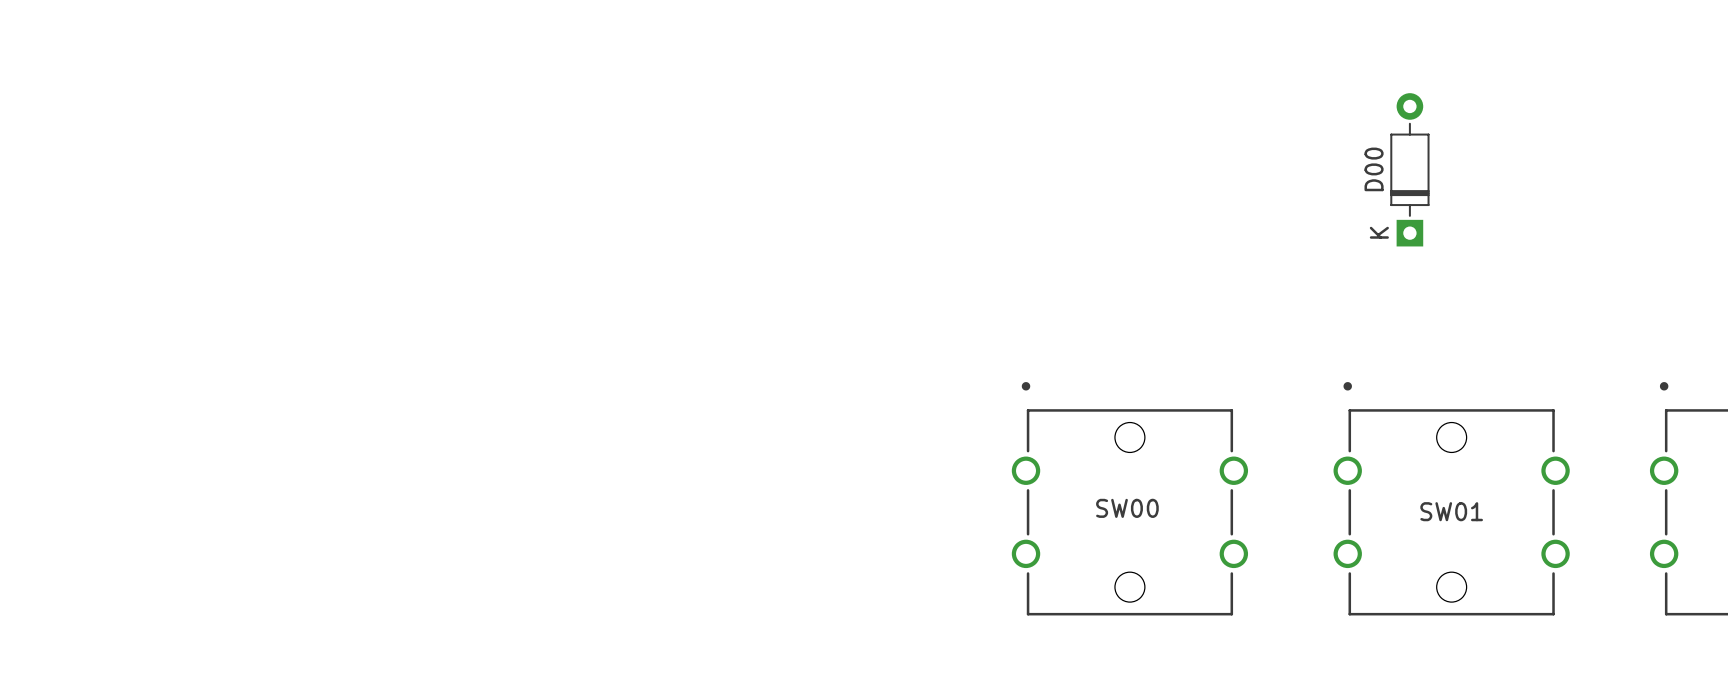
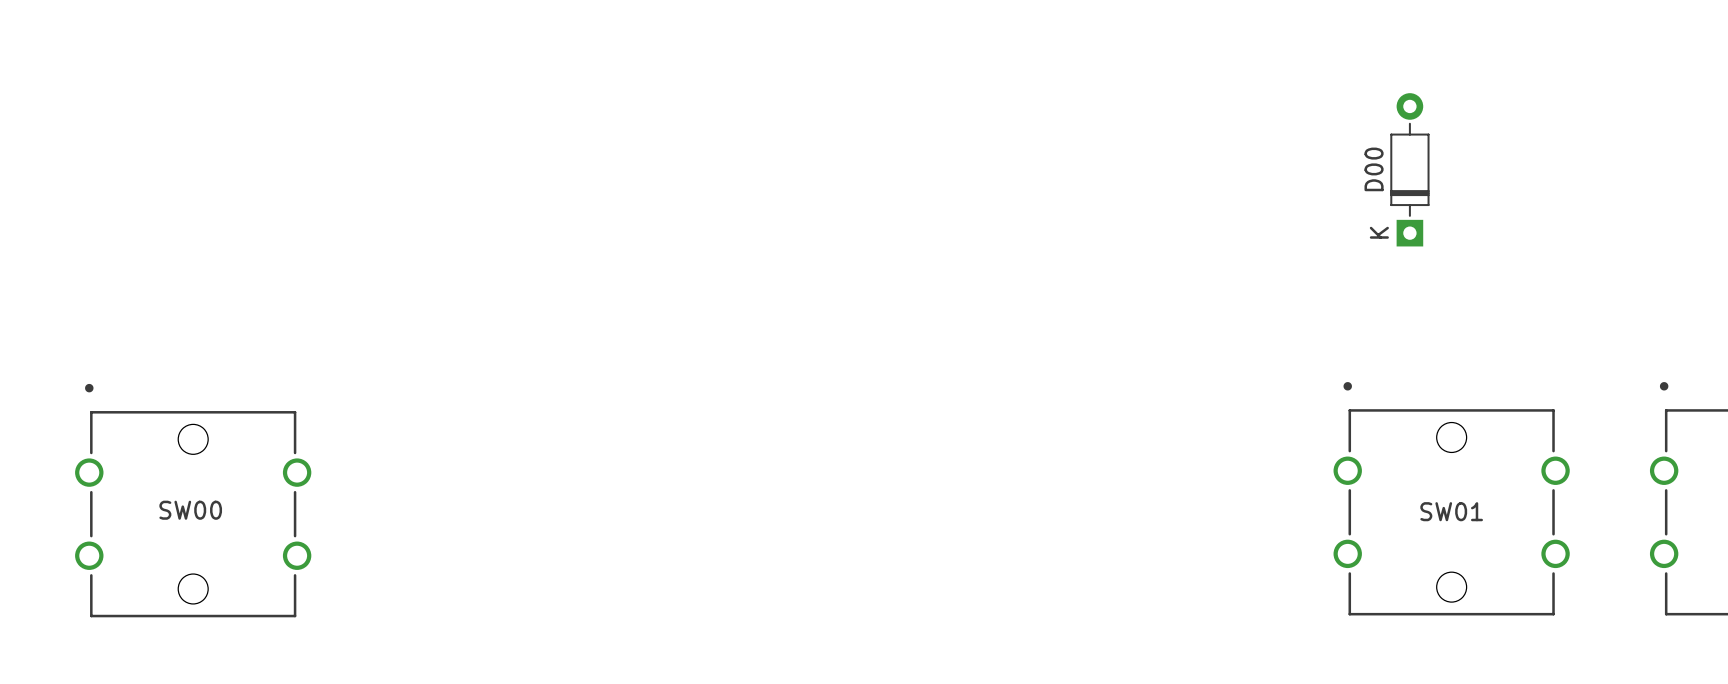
SW00 position: (1129, 498) -> (193, 500)

